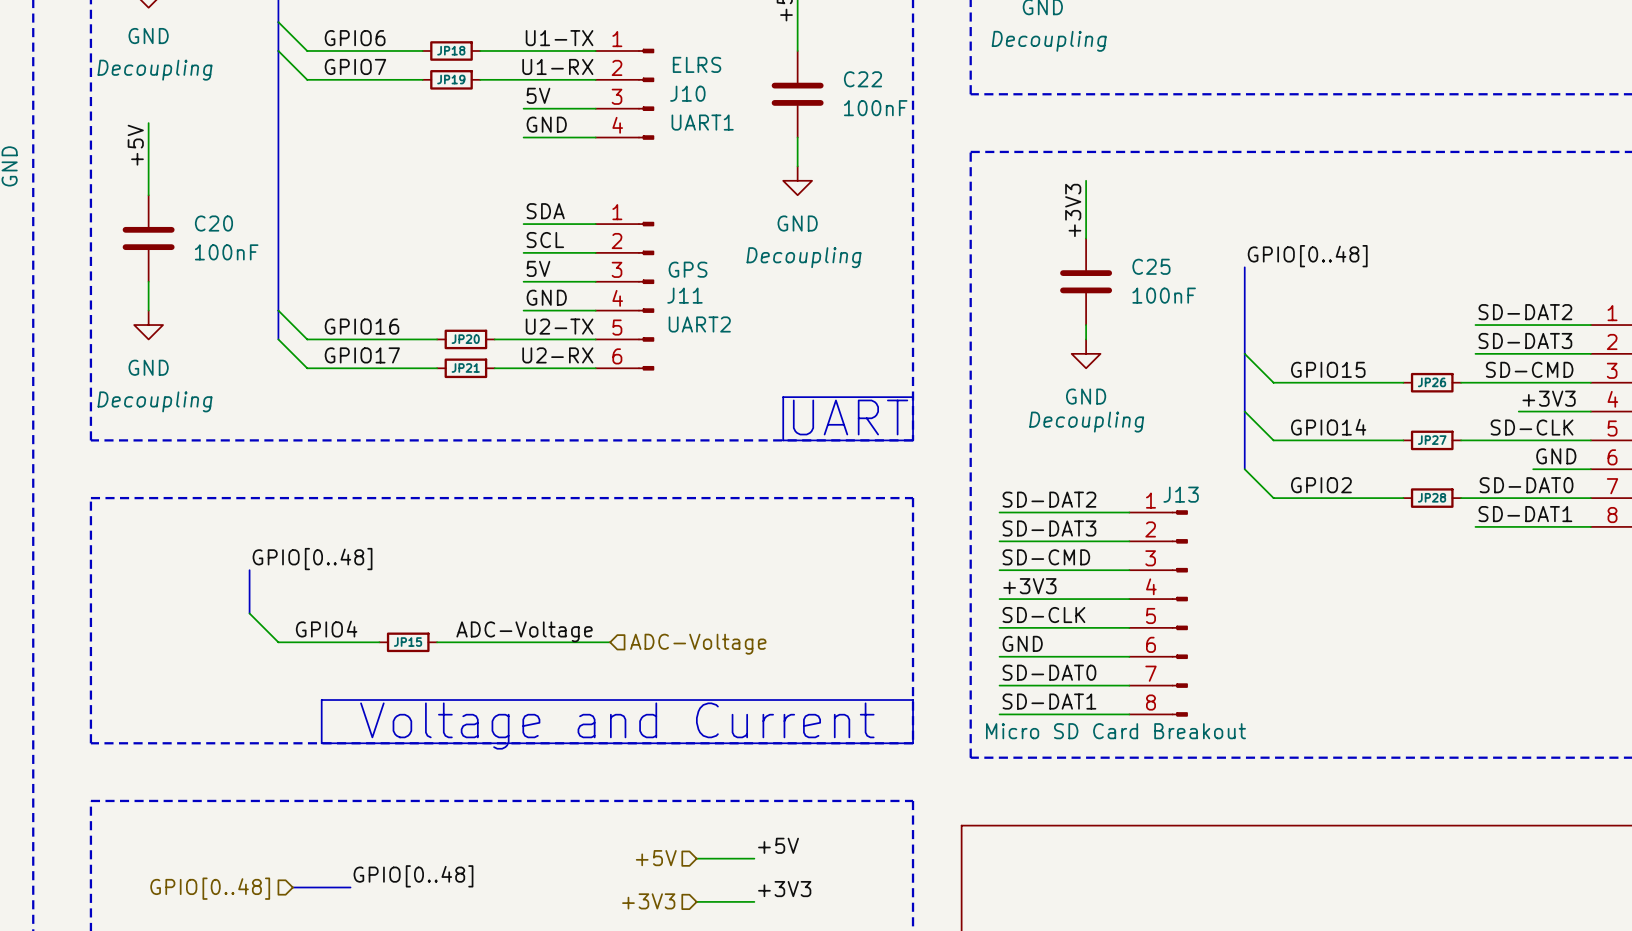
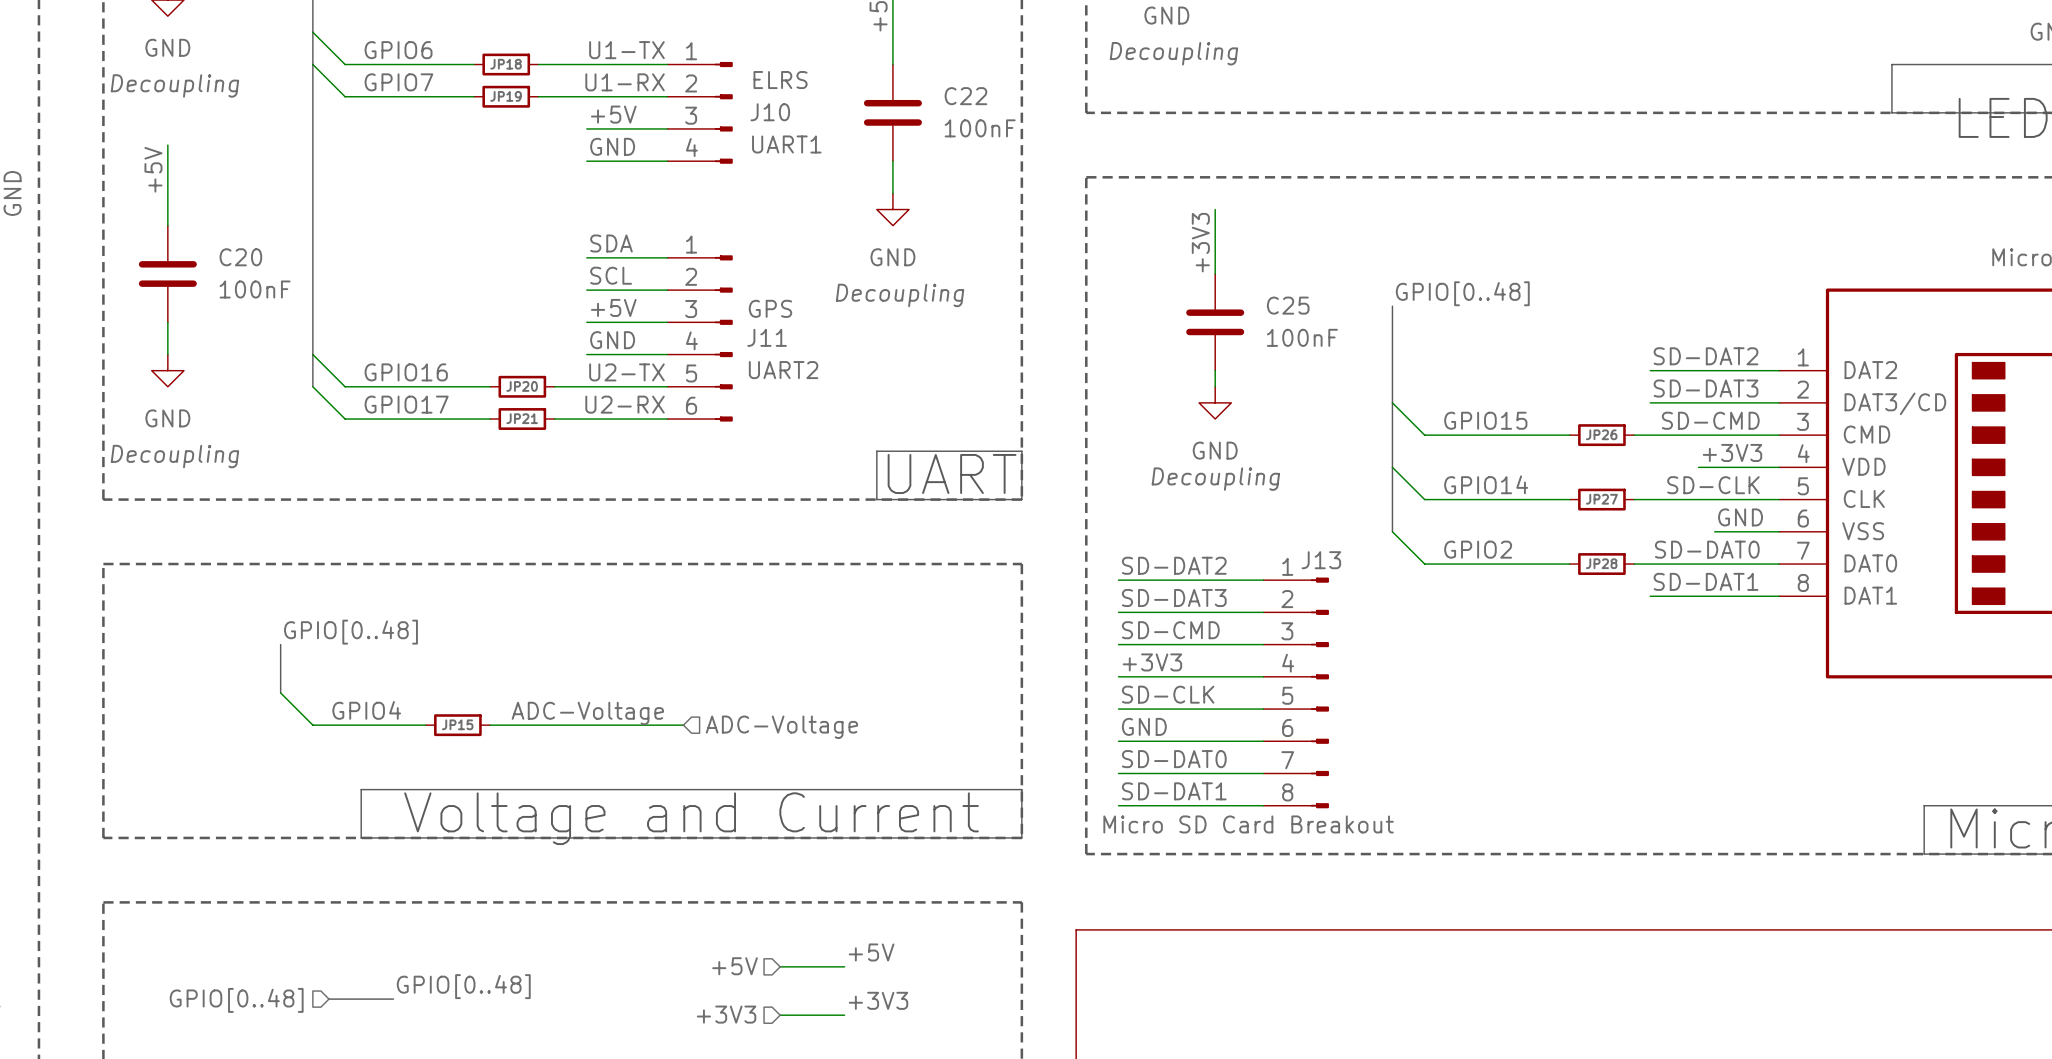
label: 5V (538, 95) -> +5V (613, 114)
label: 5V (538, 268) -> +5V (613, 307)

